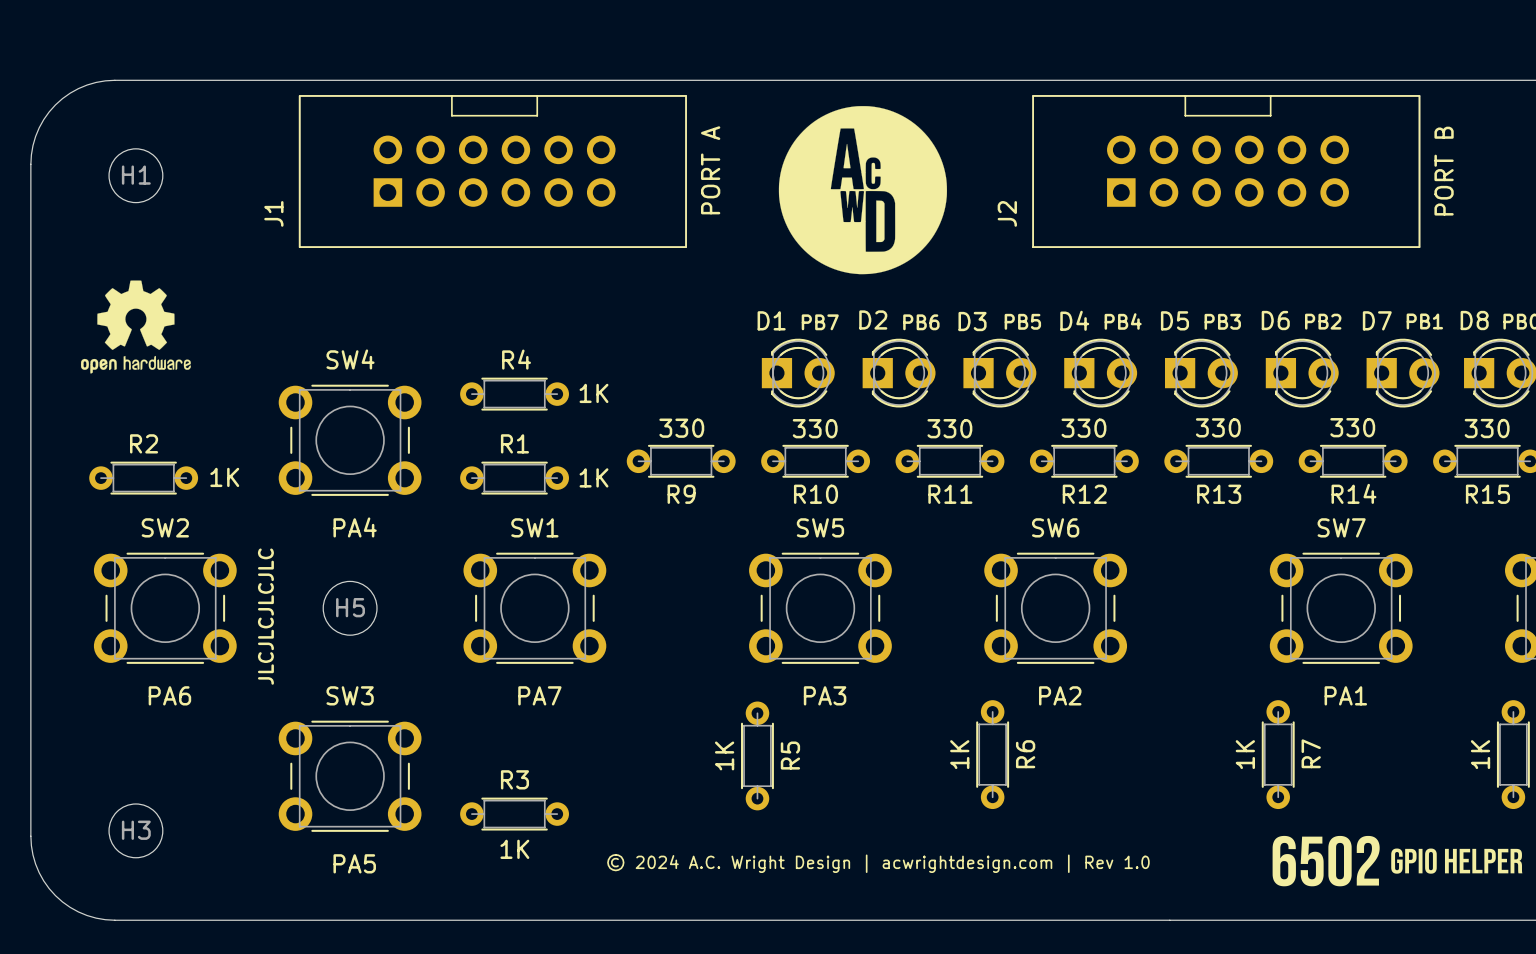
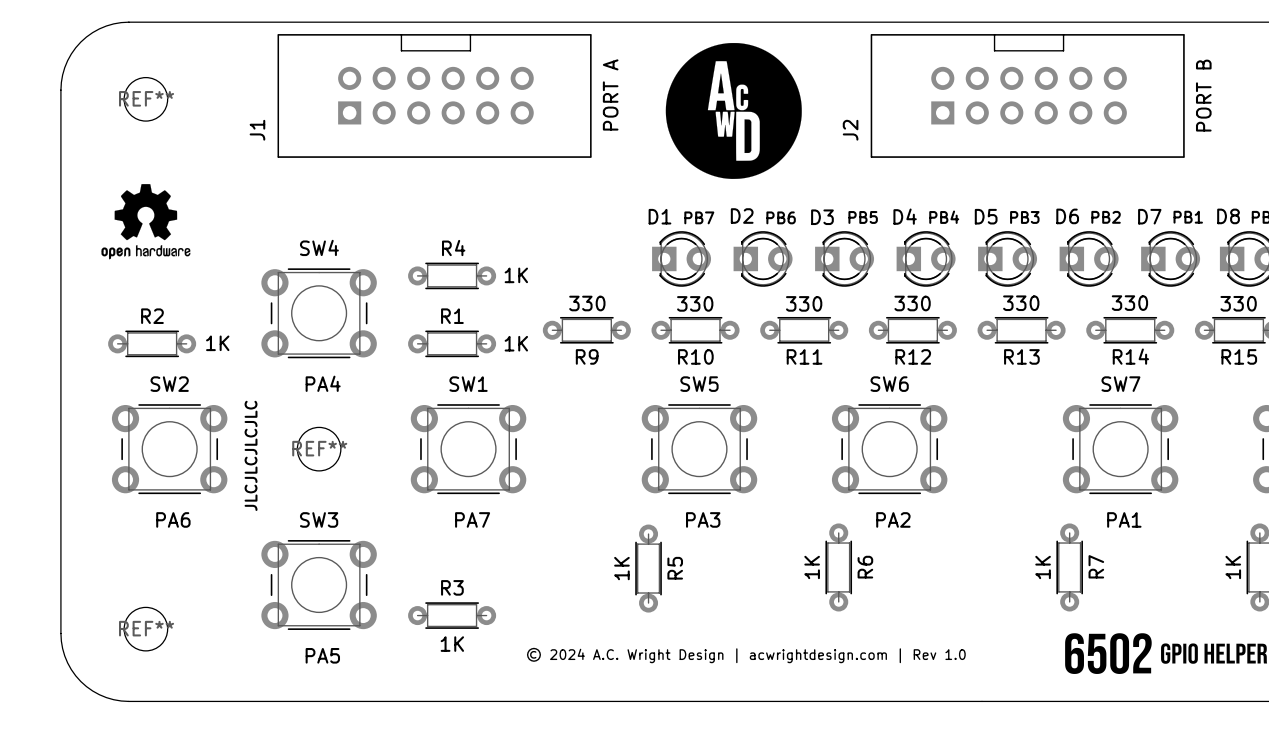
H1 name: H1 (136, 175) -> REF** (146, 98)
H5 name: H5 (350, 607) -> REF** (319, 448)
H3 name: H3 (136, 830) -> REF** (146, 628)

